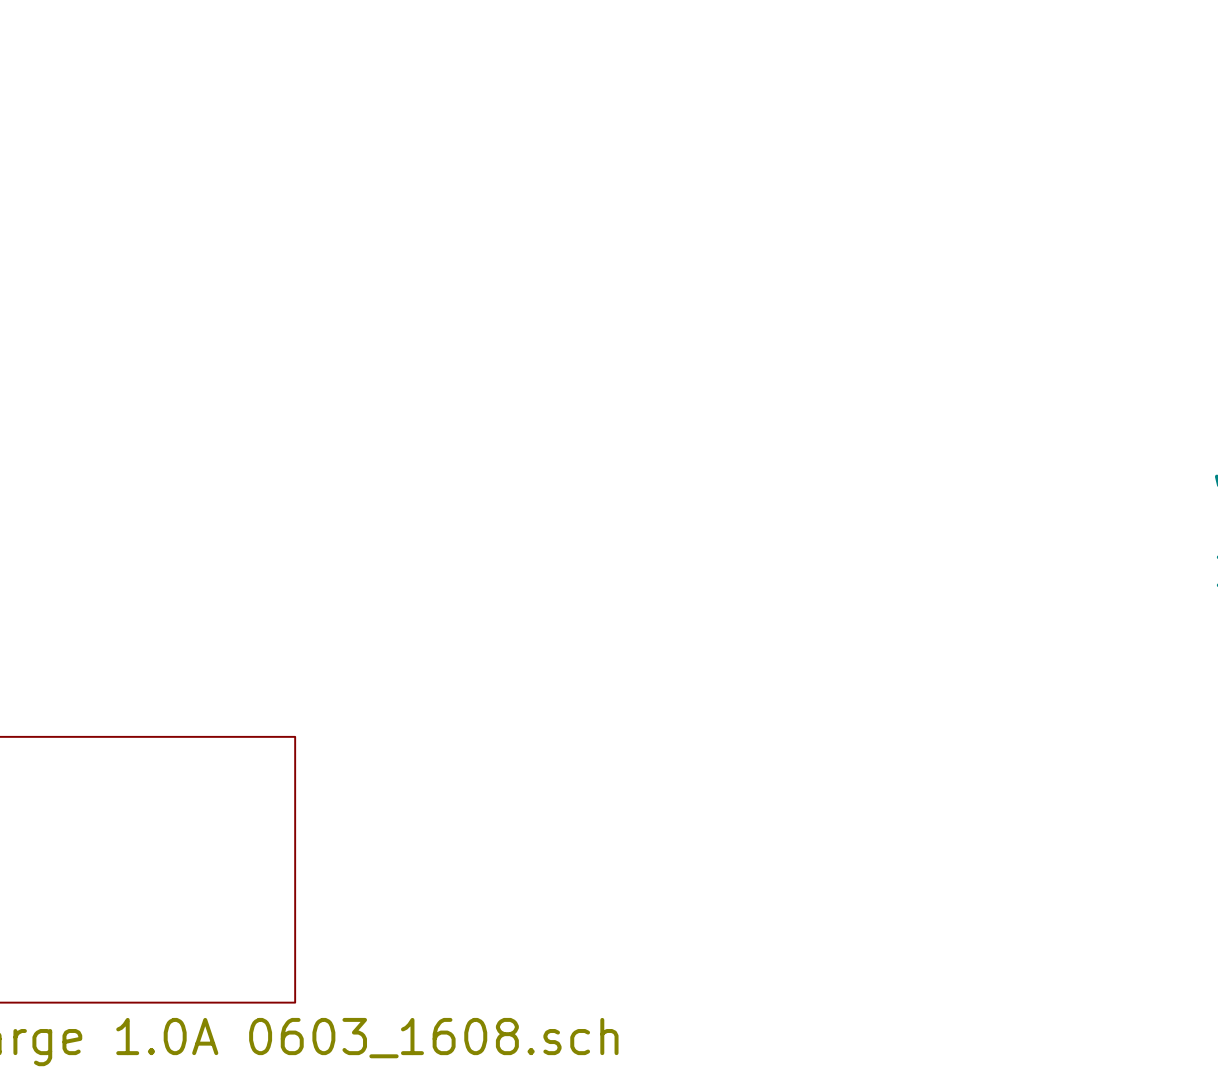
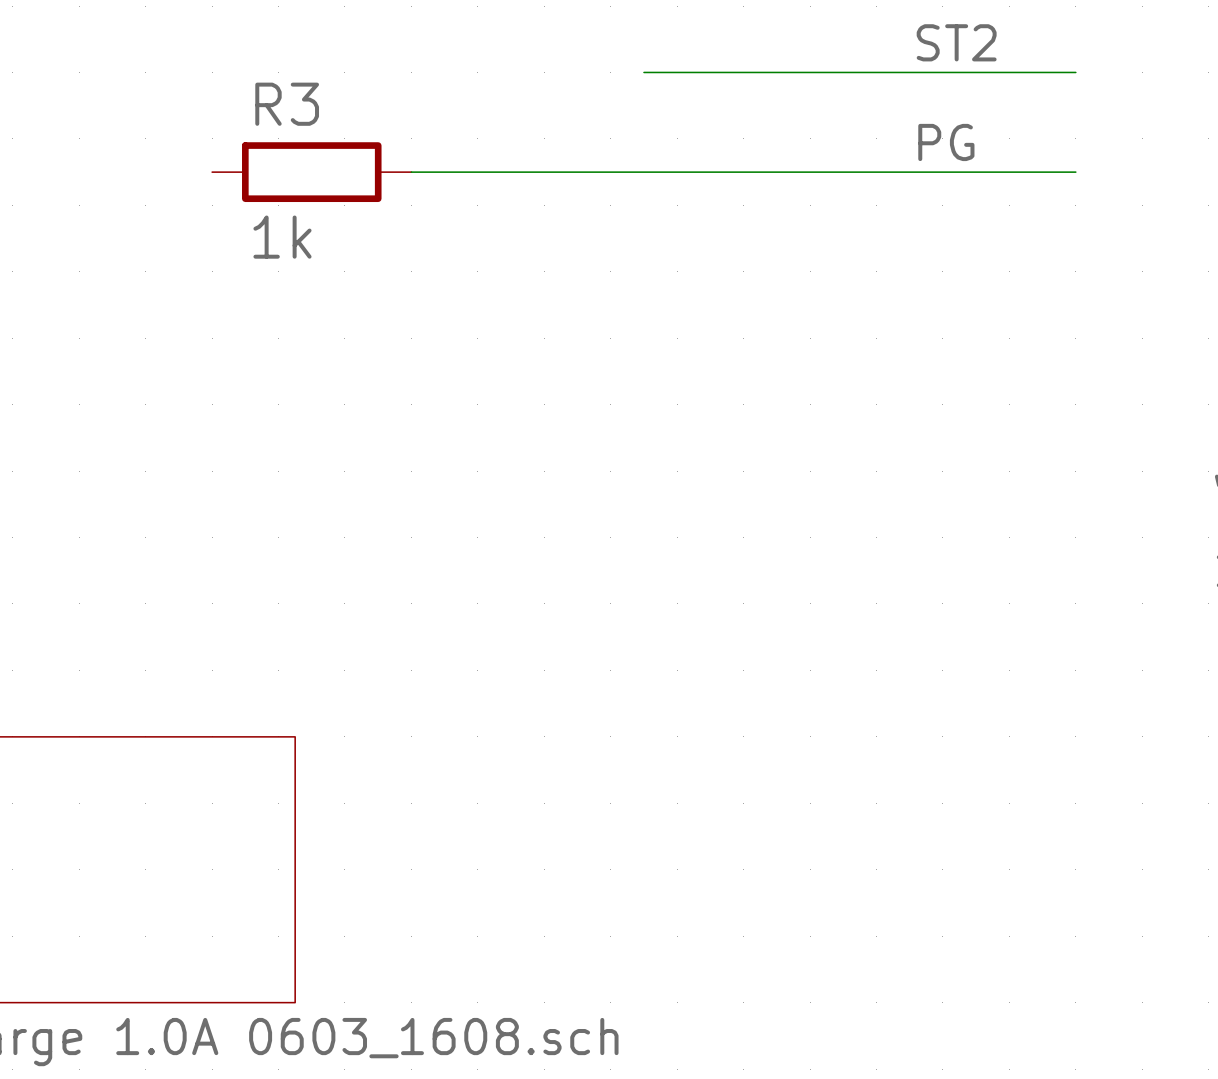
label: none -> ST2 (956, 42)
wire: none -> (643, 72) (1075, 72)
label: none -> PG (946, 142)
R3: none -> 1k (311, 172)
wire: none -> (411, 172) (1075, 172)

